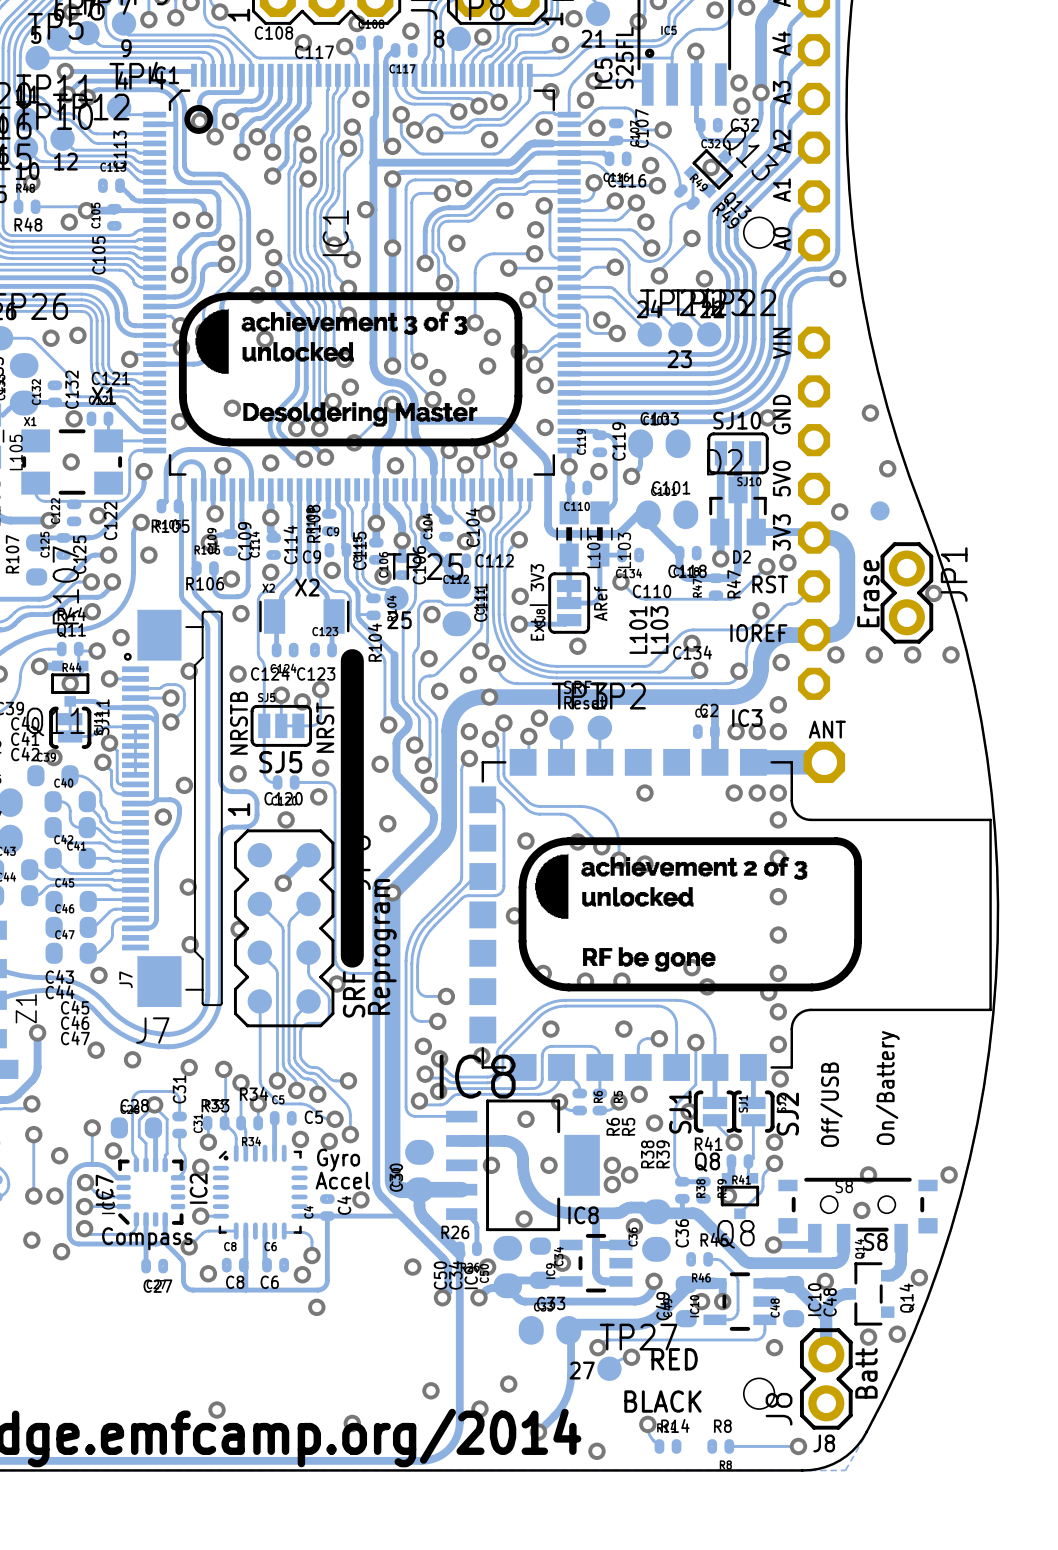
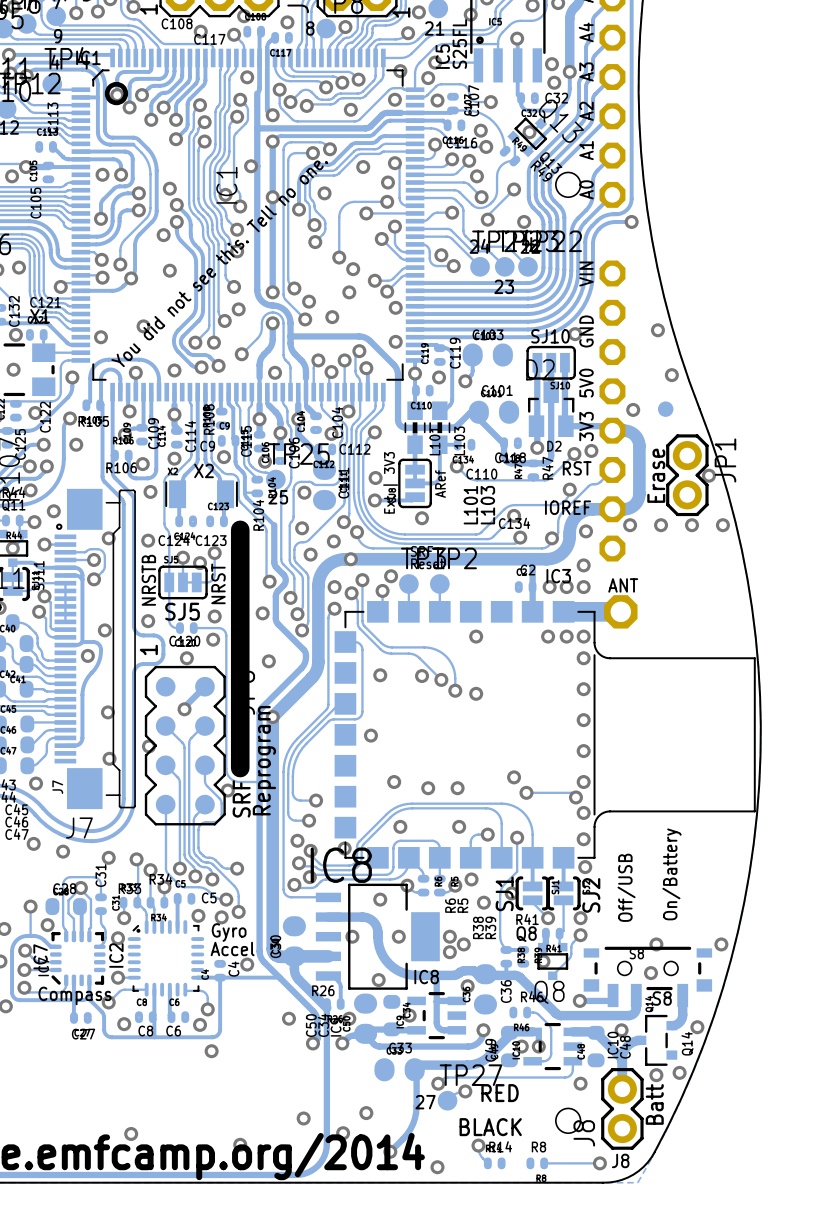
drawing: [178, 292, 523, 447] -> none
text: none -> You did not see this. Tell no one. (219, 263)
part footprint: [469, 748, 992, 1081] -> [334, 601, 756, 869]
drawing: [518, 837, 862, 992] -> none

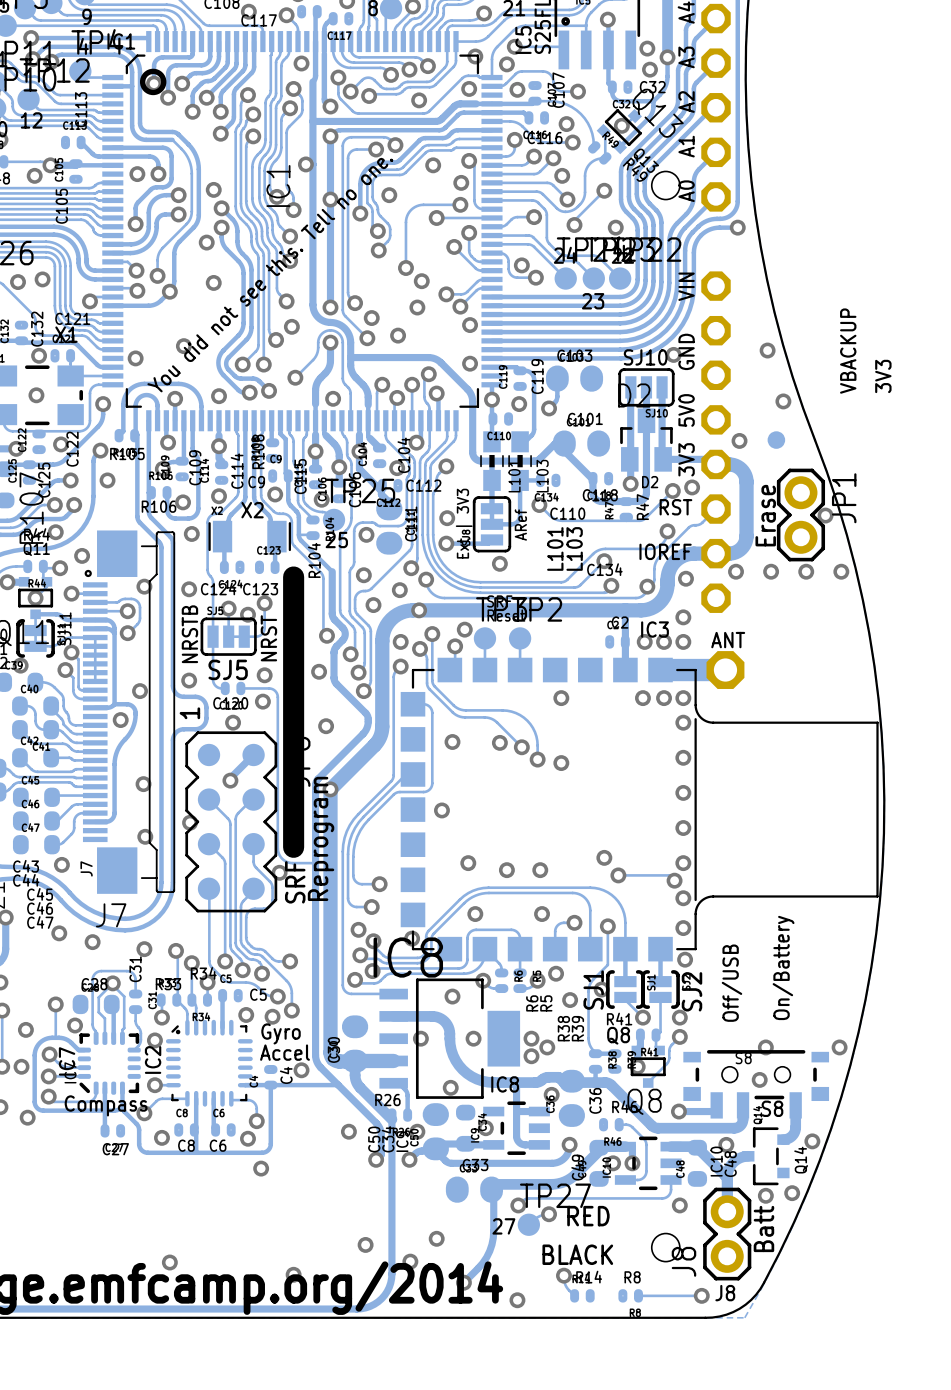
text: none -> VBACKUP (848, 351)
text: none -> 3V3 (883, 376)

